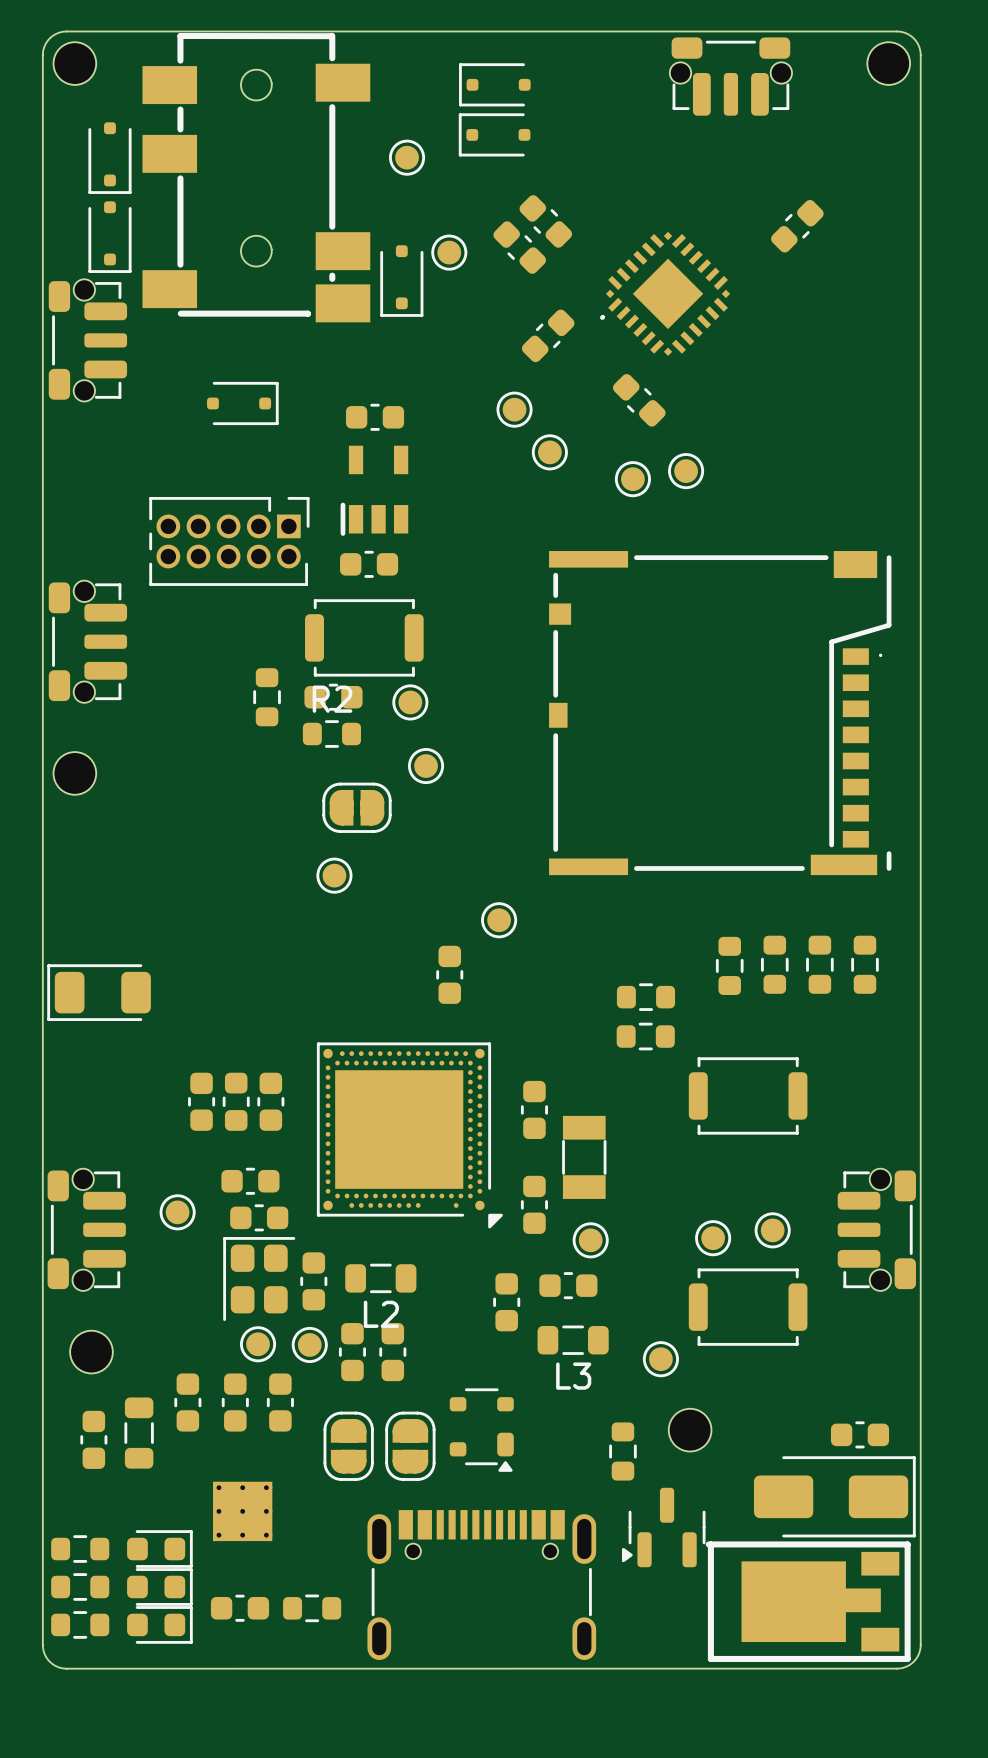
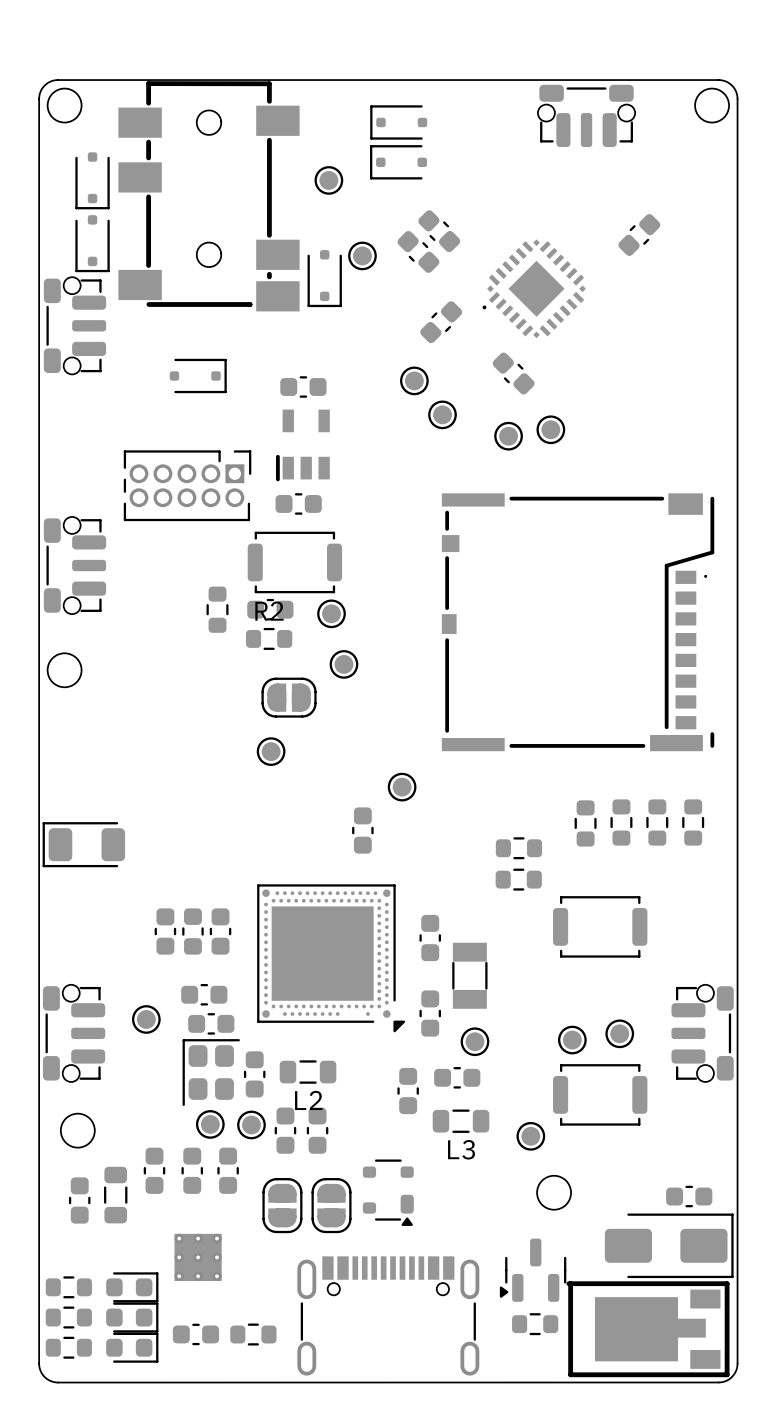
part rotation: 0° (622, 1451) -> 90° clockwise (535, 1324)
part position: (622, 1451) -> (535, 1324)

